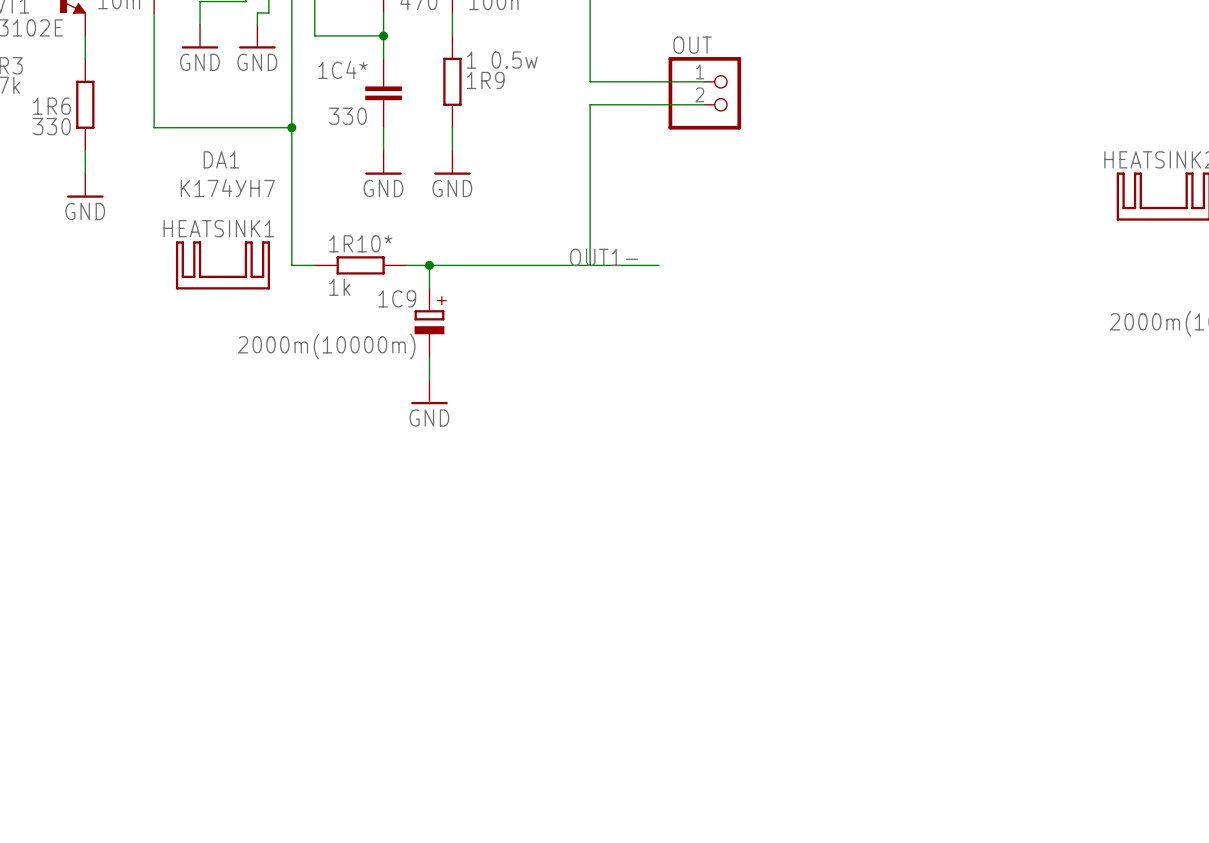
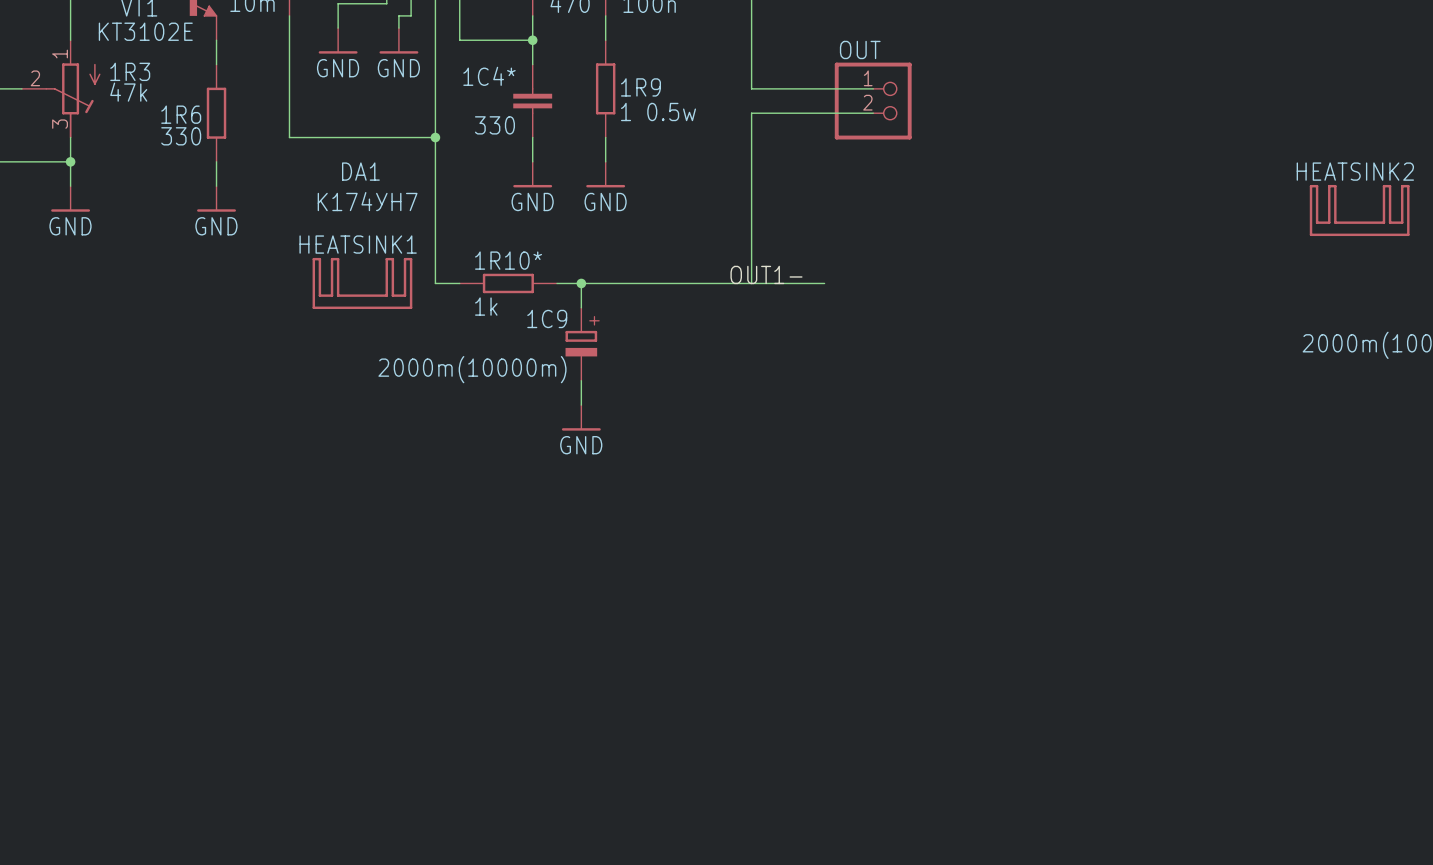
1R9 value position: 1 0.5w (502, 60) -> 1 0.5w (658, 111)

